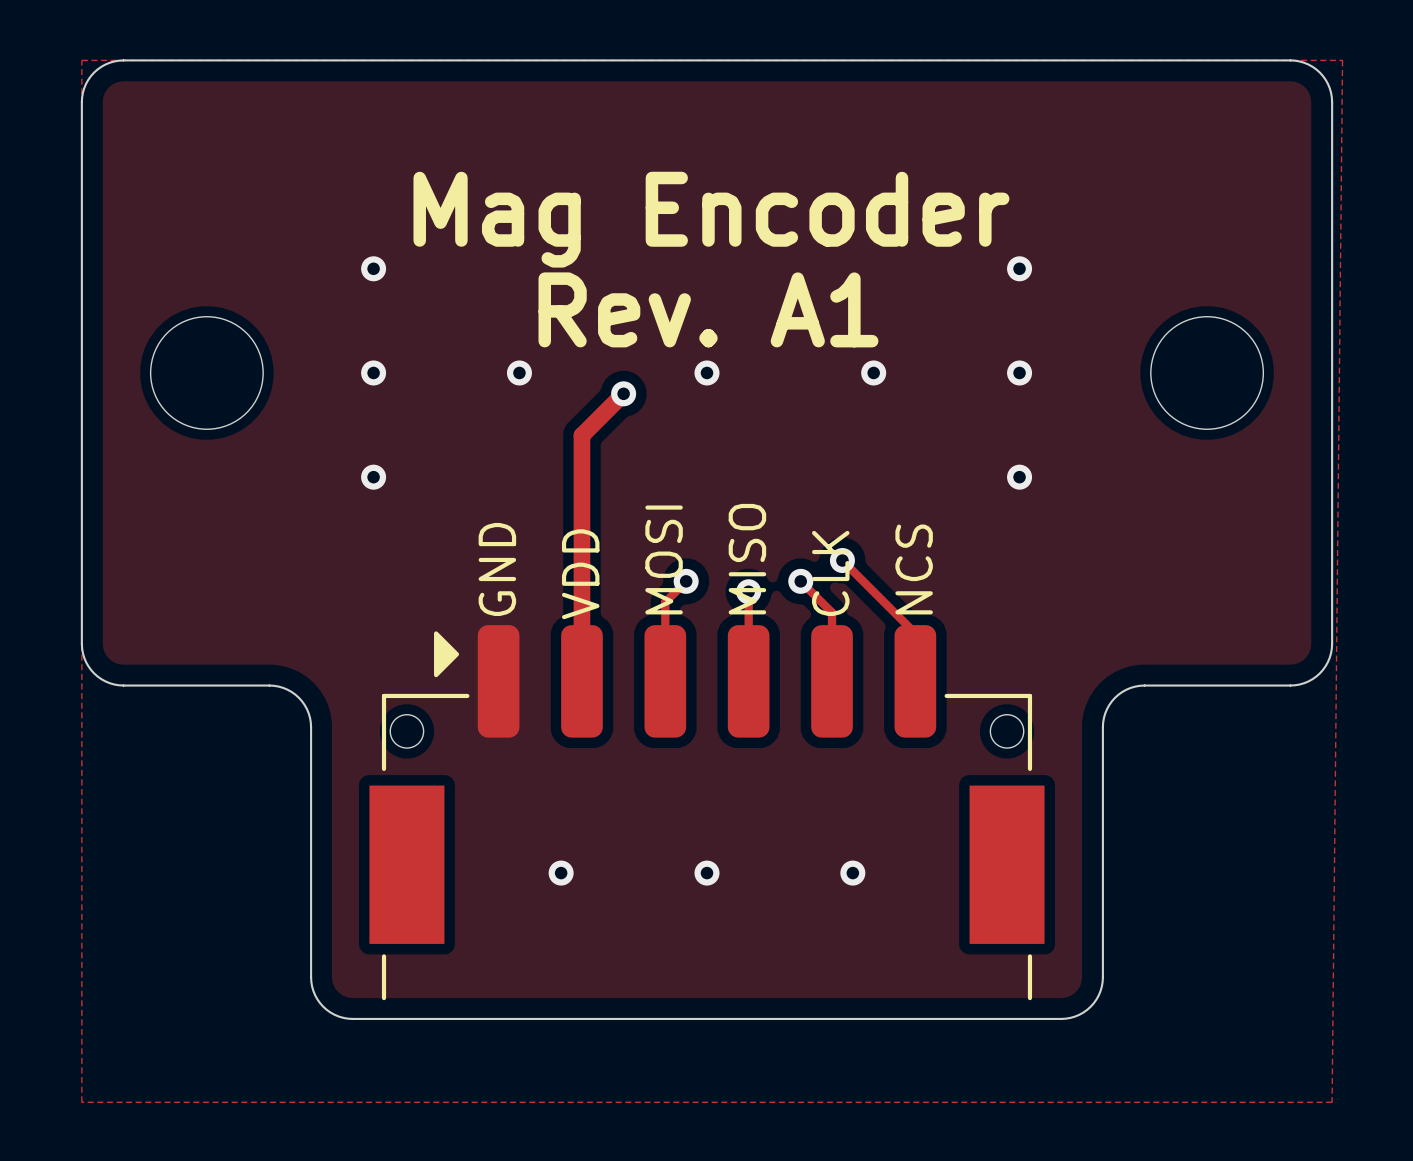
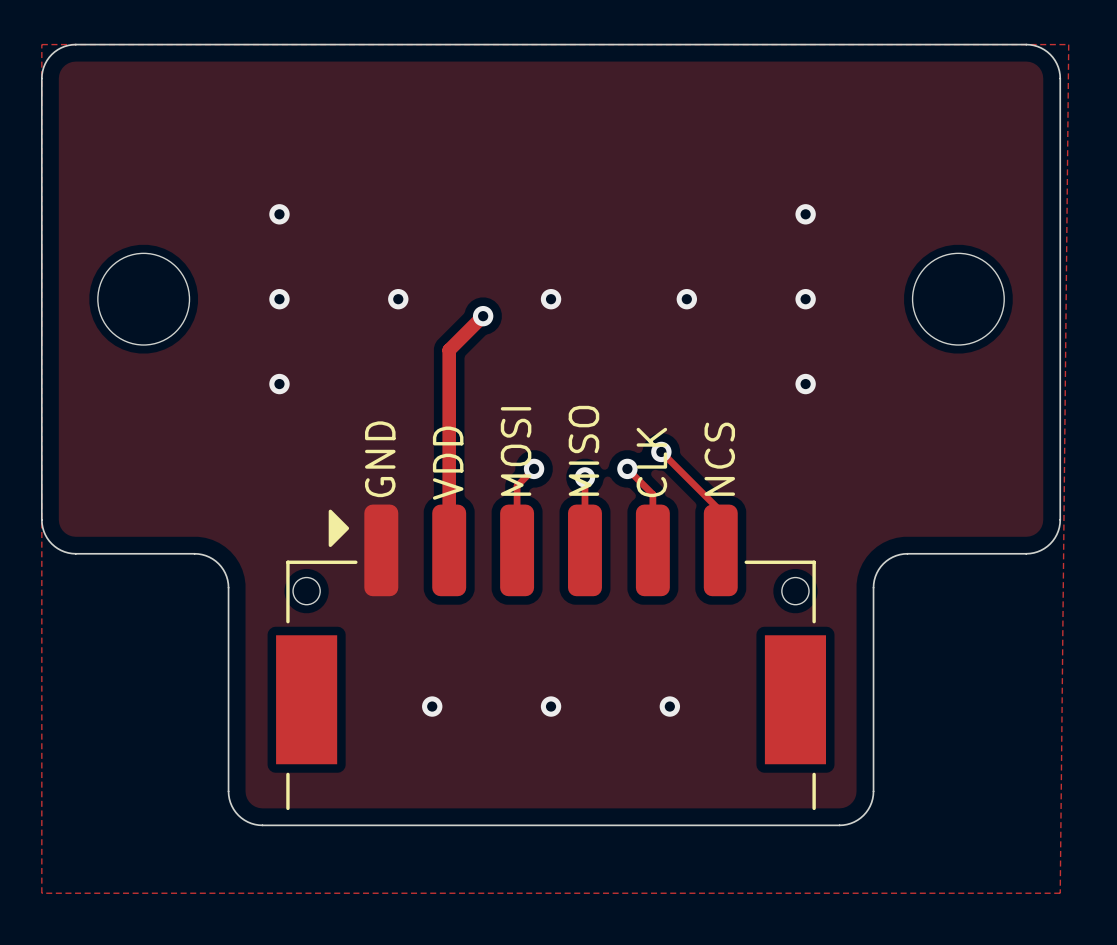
text: Mag Encoder (711, 219) -> none
text: Rev. A1 (708, 309) -> none

